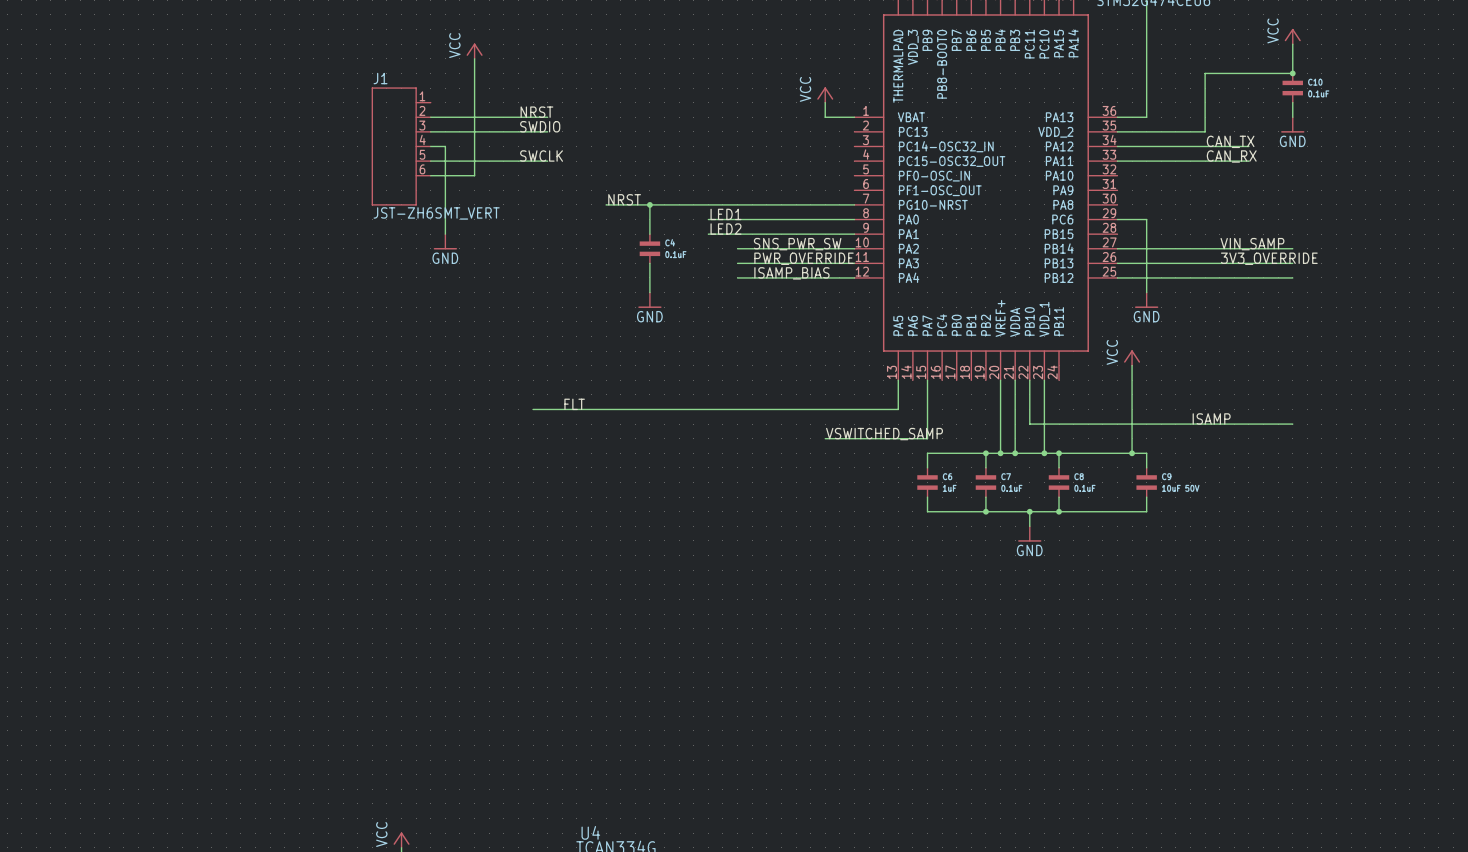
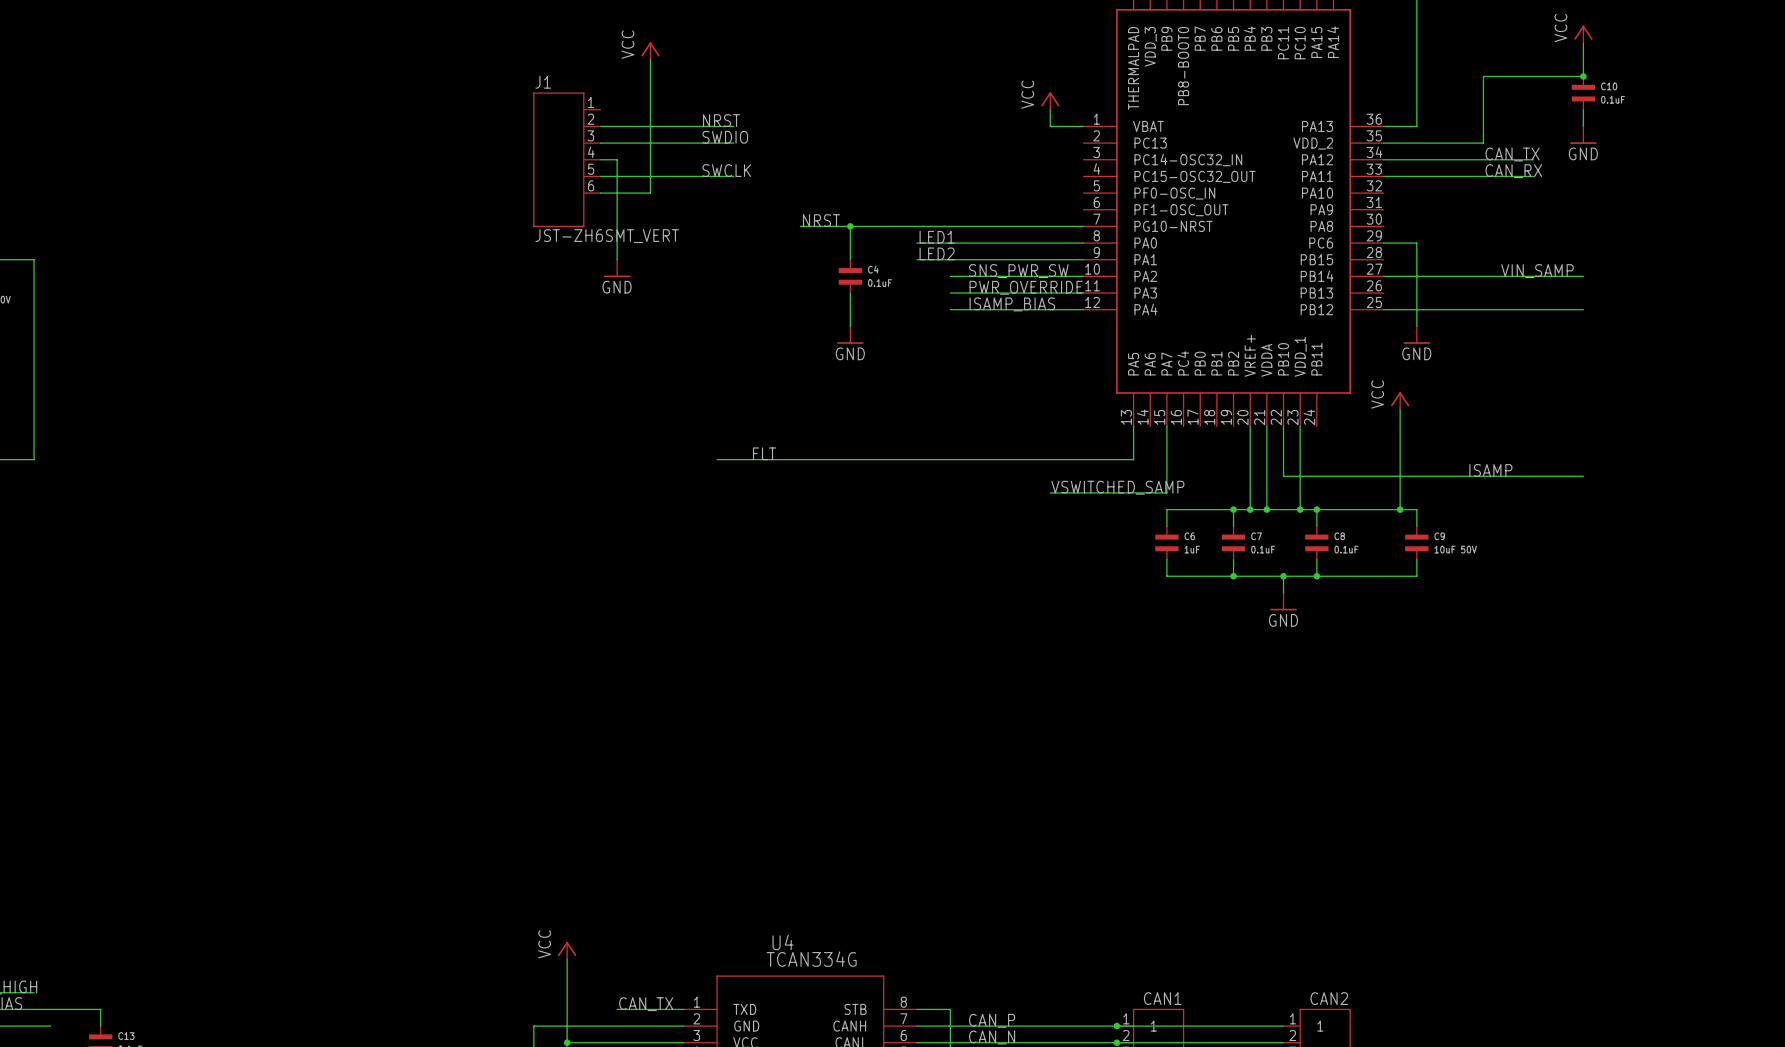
label: 3V3_OVERRIDE (1269, 258) -> none
wire: (1117, 263) (1292, 263) -> none

